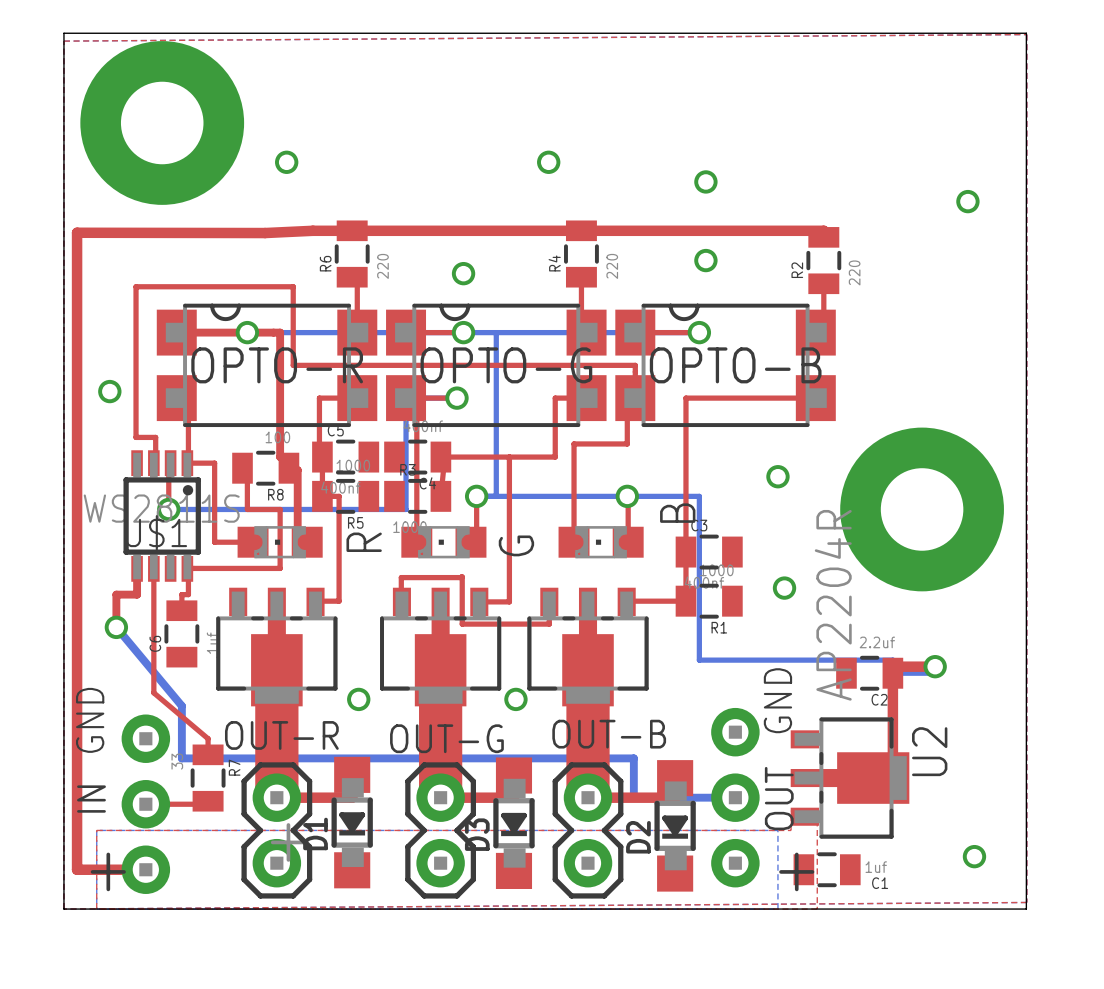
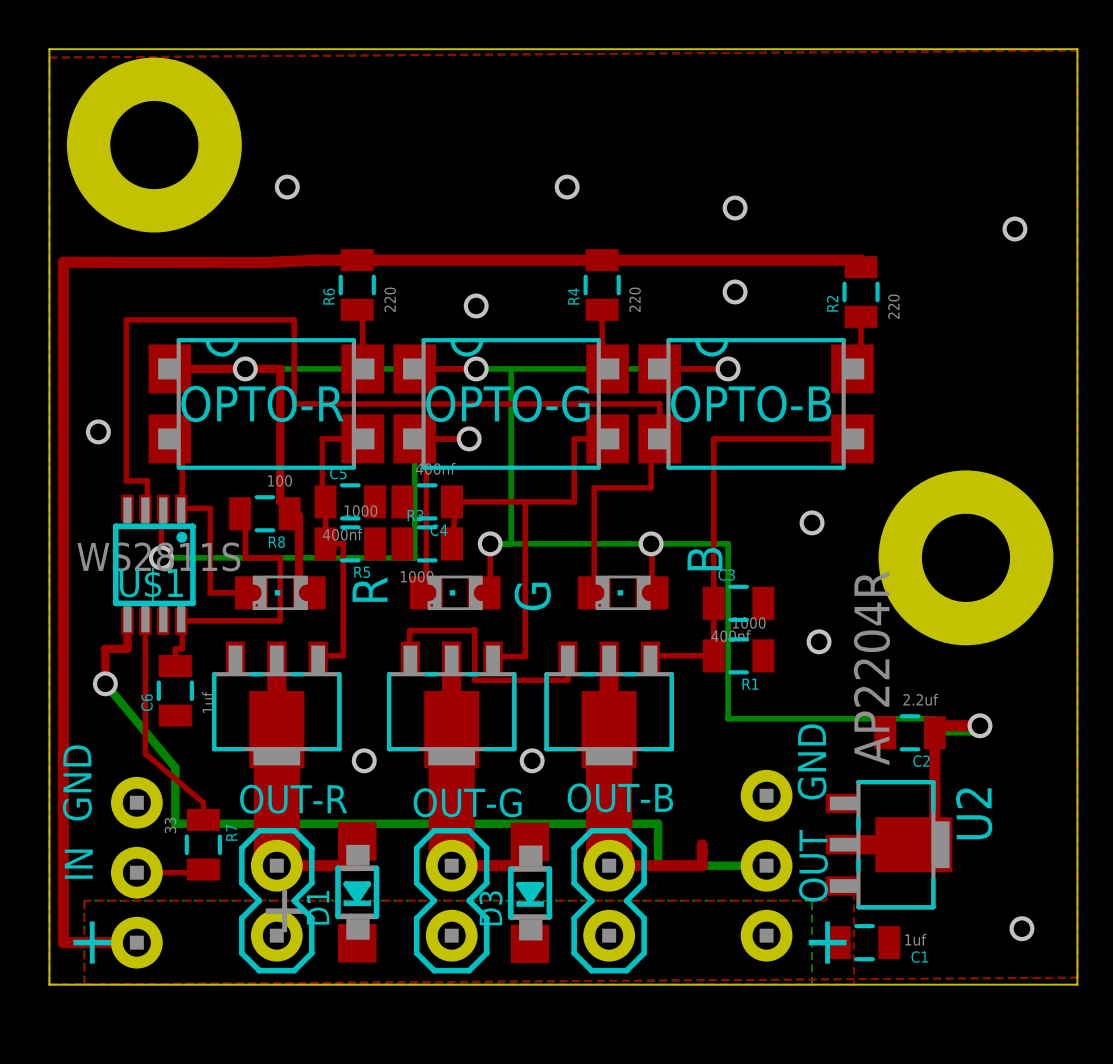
D2: (675, 825) -> none

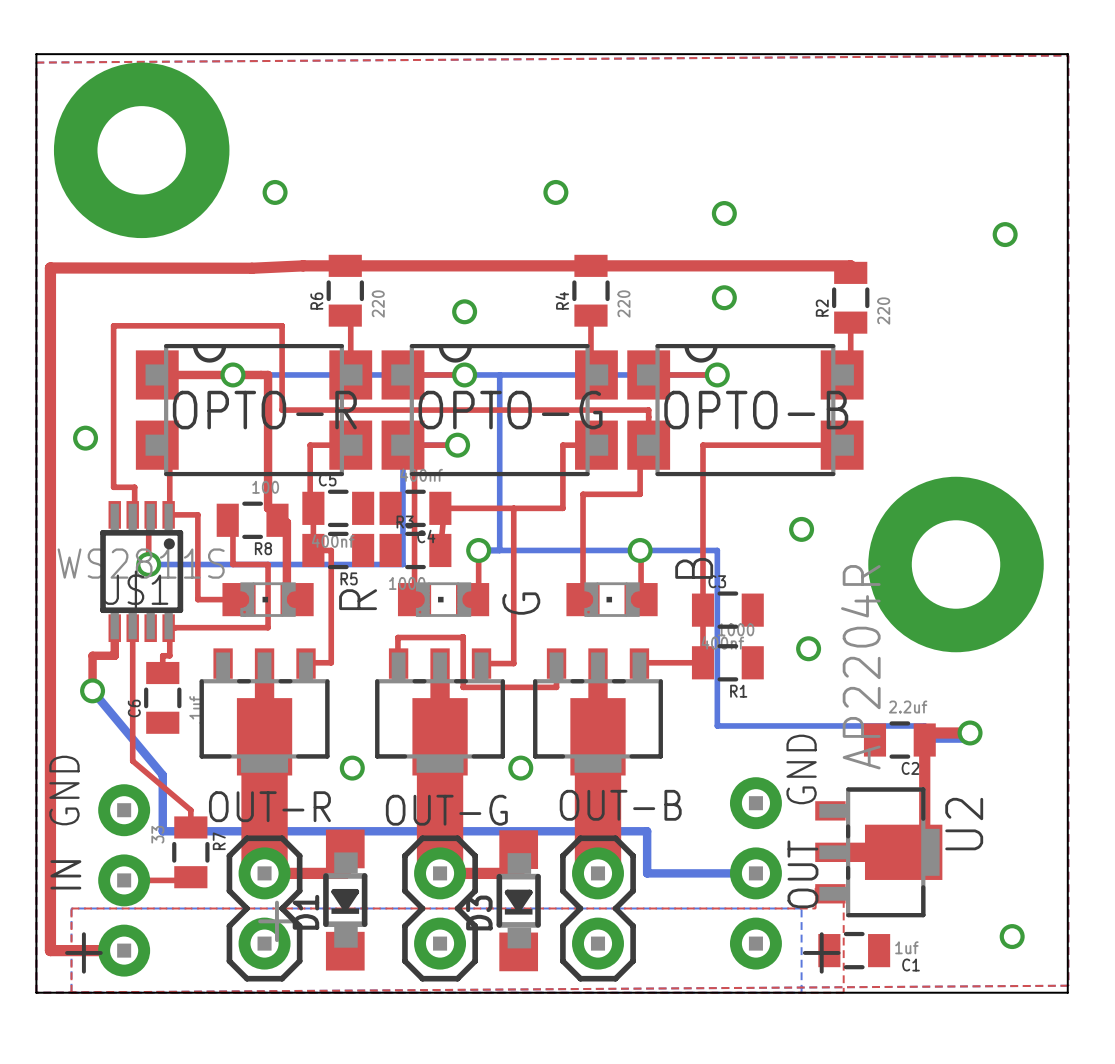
R5 value: 1000 (360, 510) -> none
top track: (702, 844) (702, 865) (609, 865) -> none

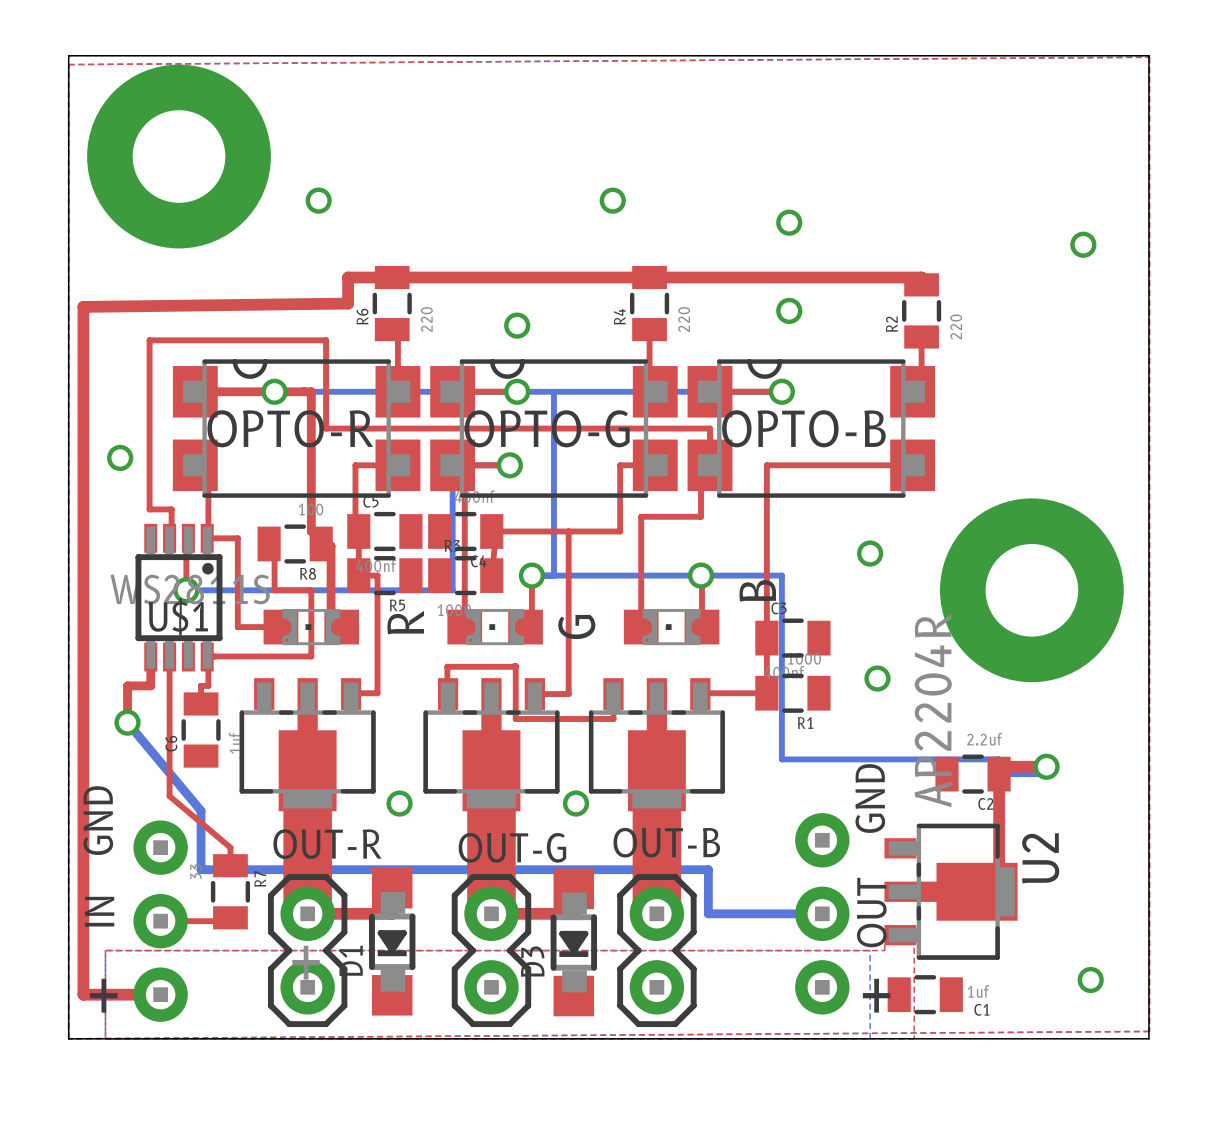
top track: (303, 265) (251, 268) (50, 267) (50, 293) -> (348, 277) (348, 303) (83, 306)

